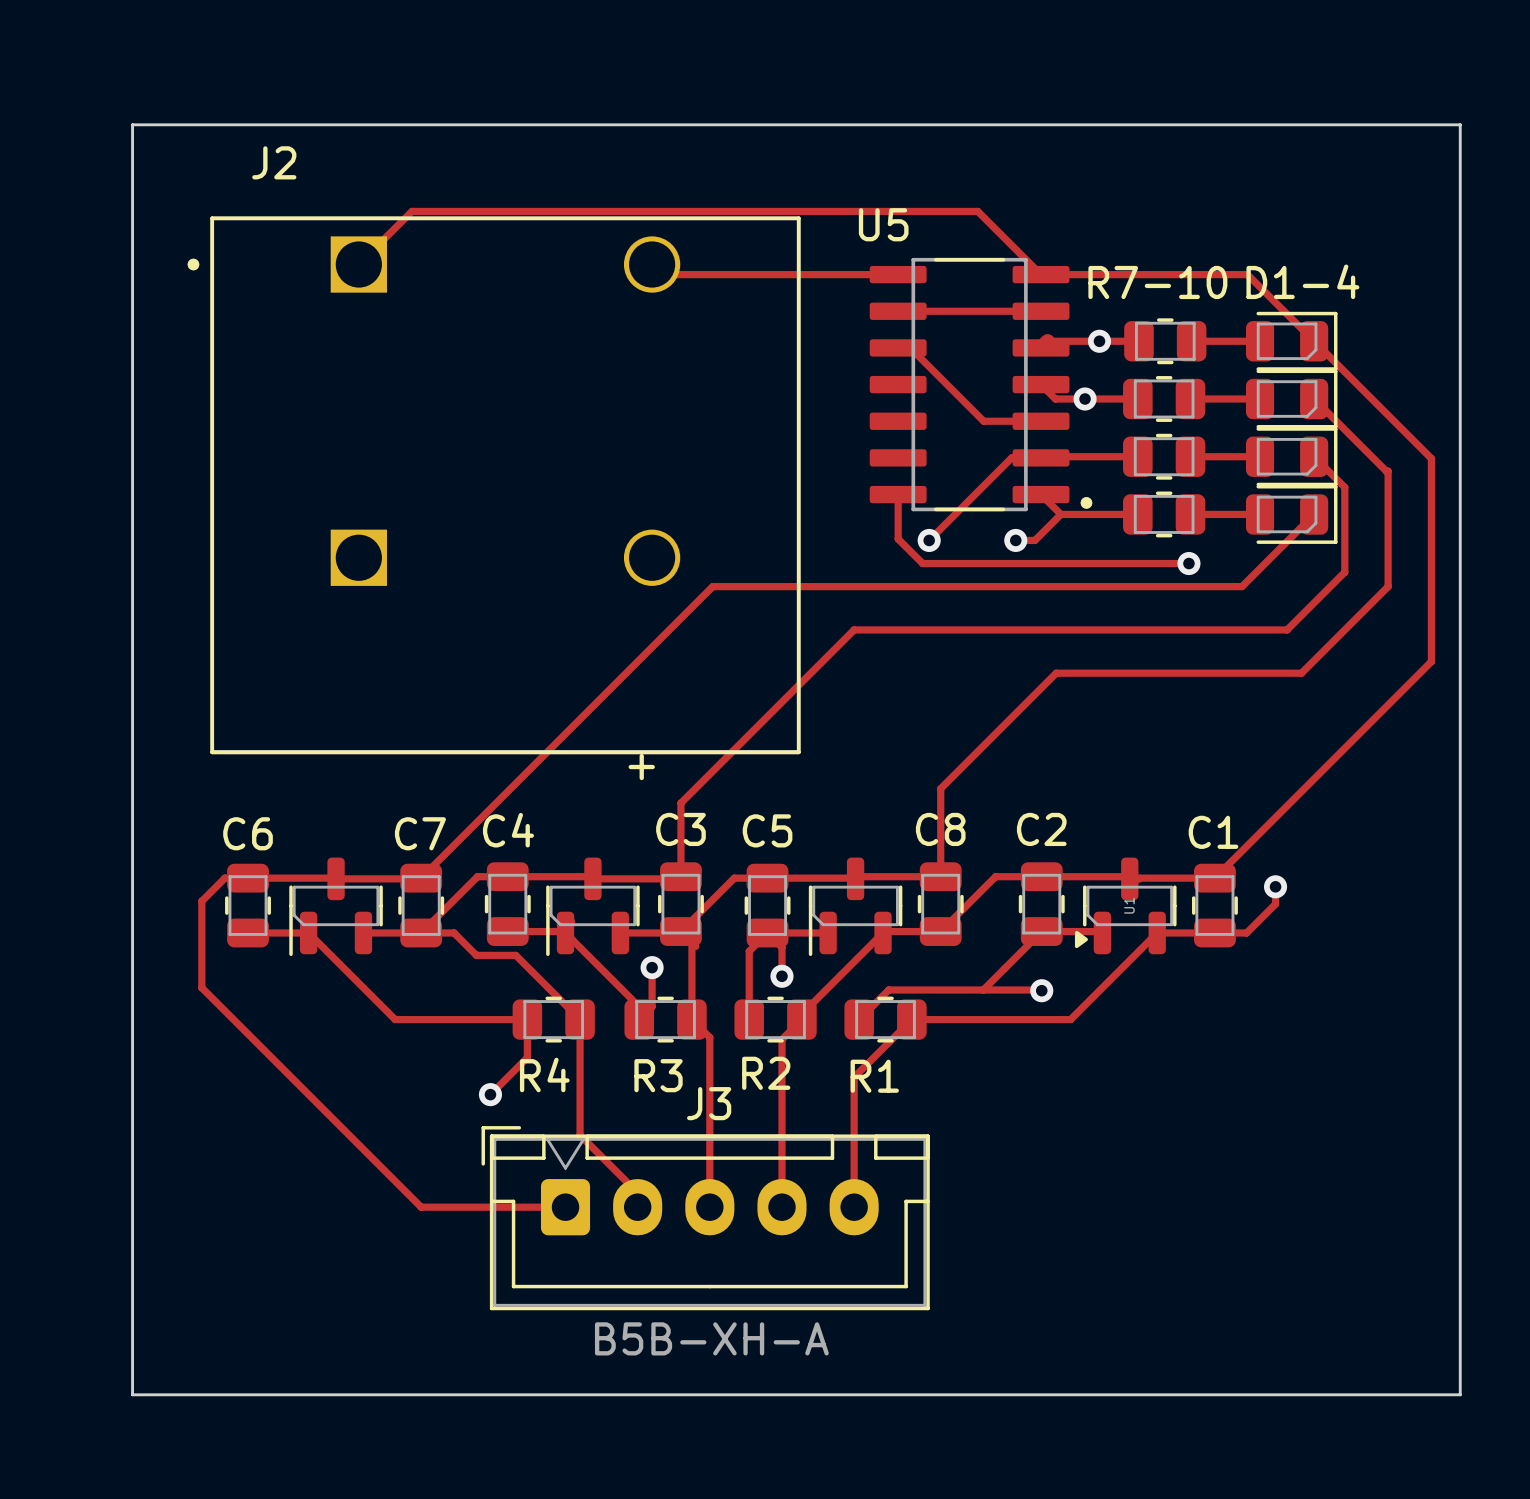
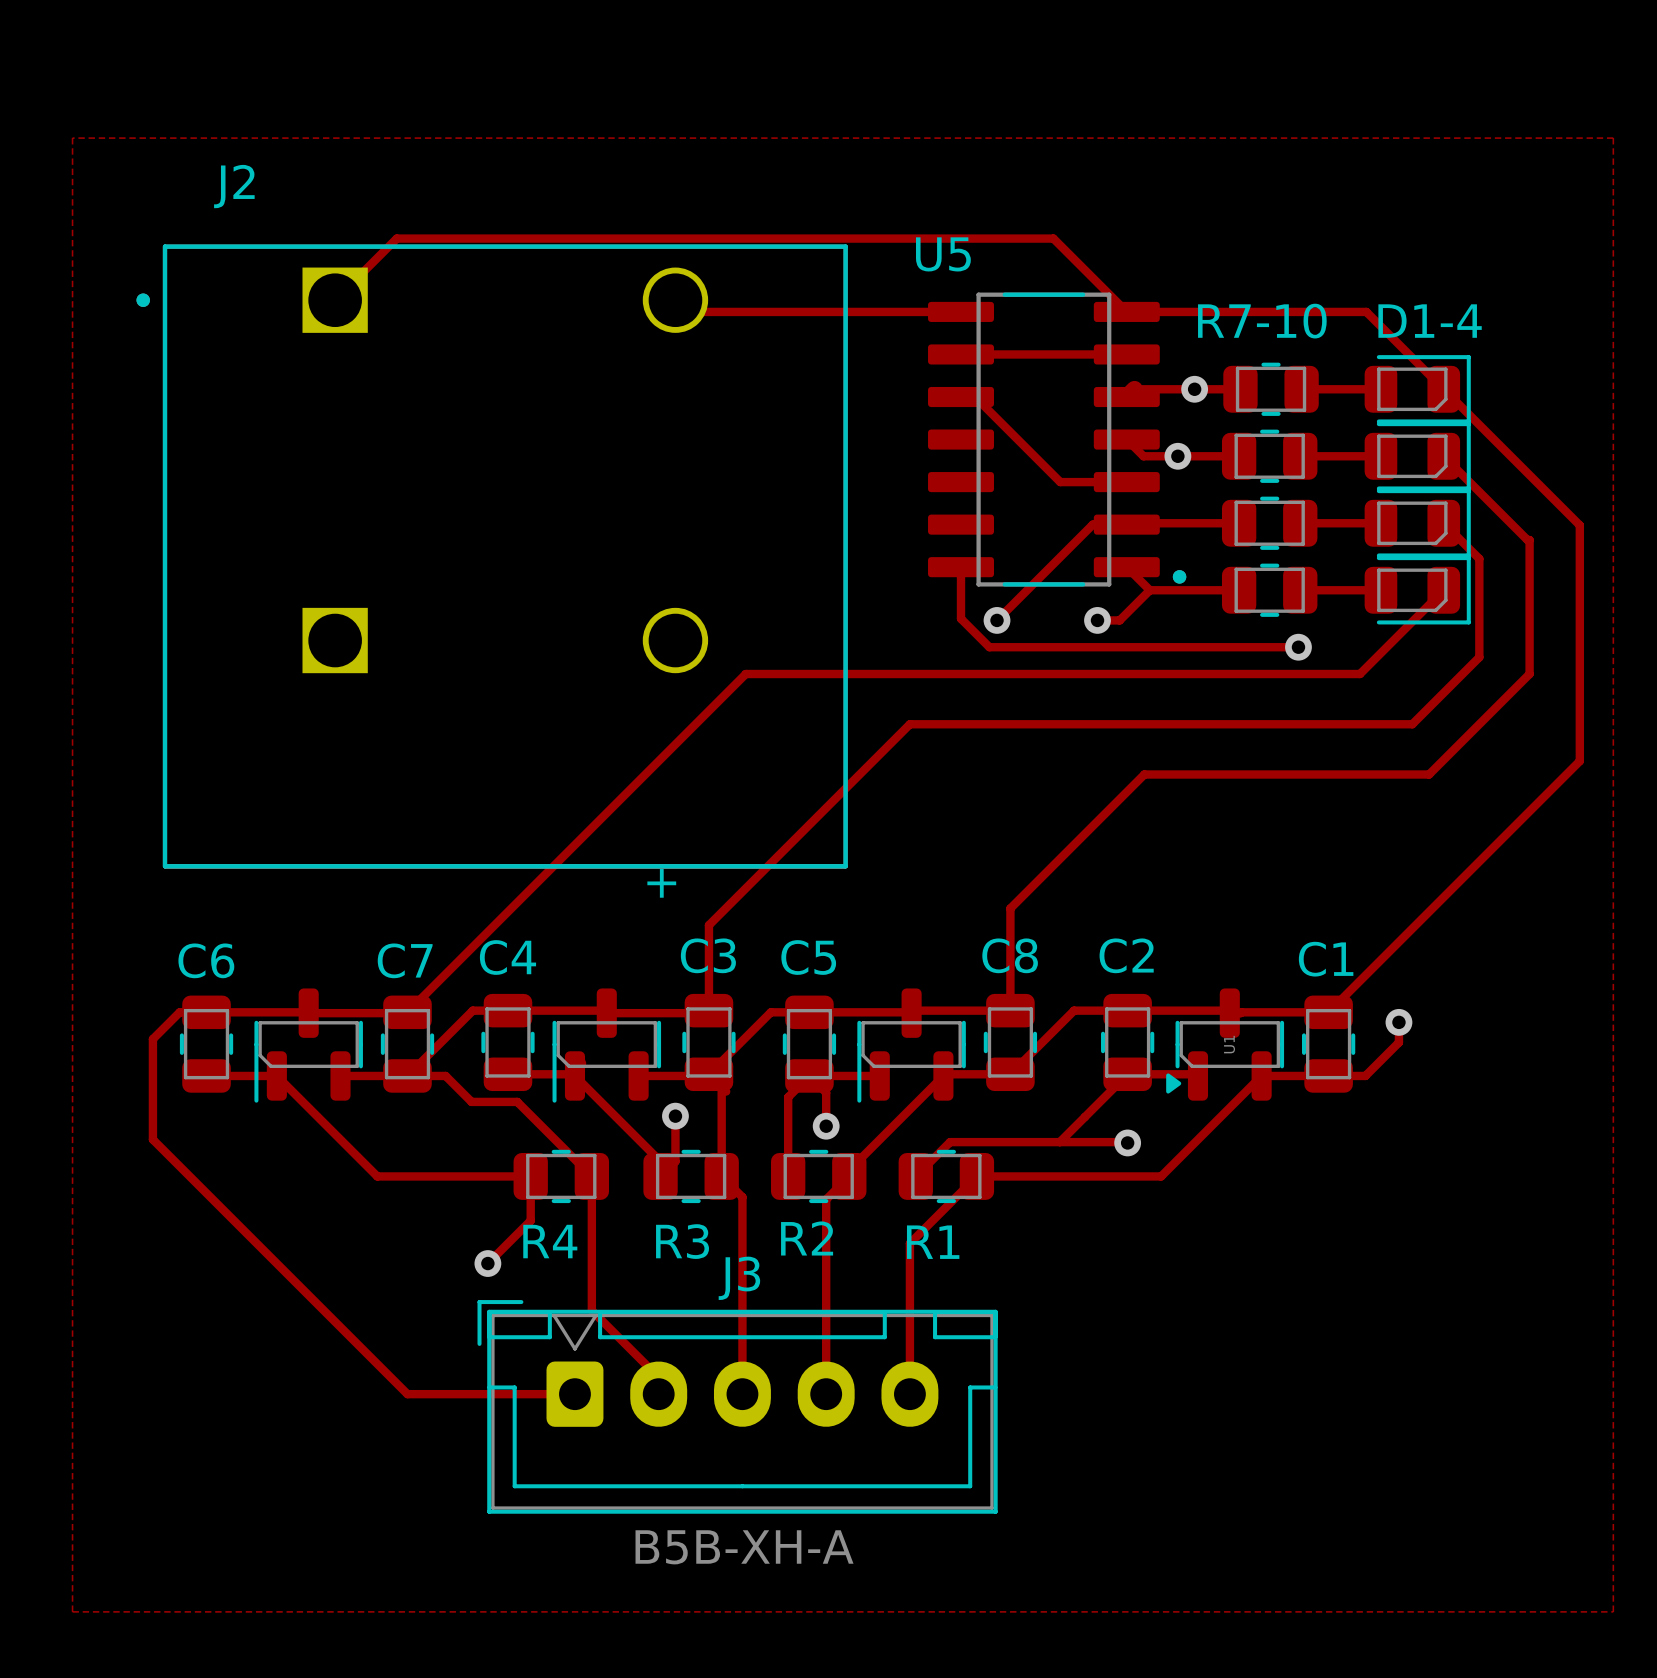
board edge: (132, 124) (1460, 124) (1460, 1394) (132, 1394) (132, 124) -> none

